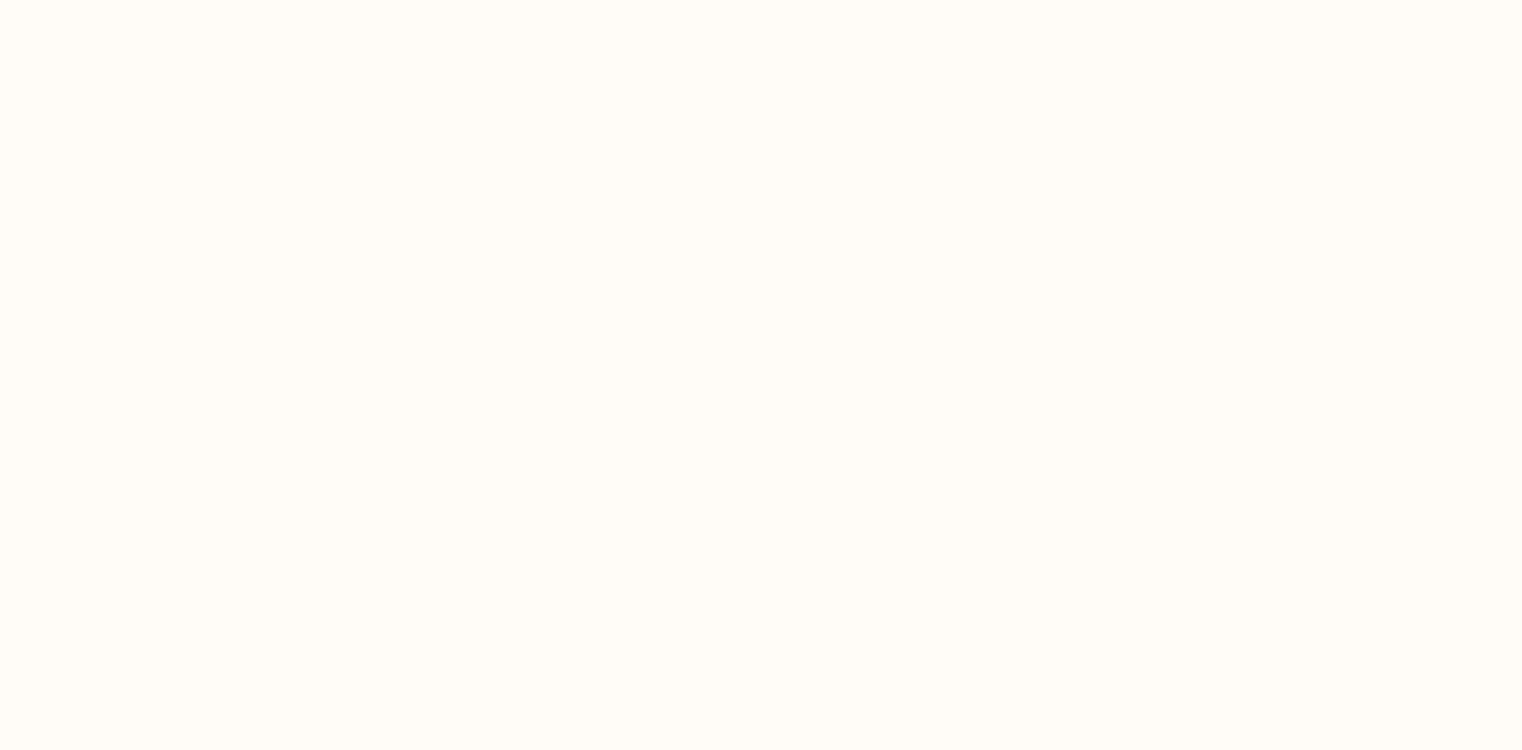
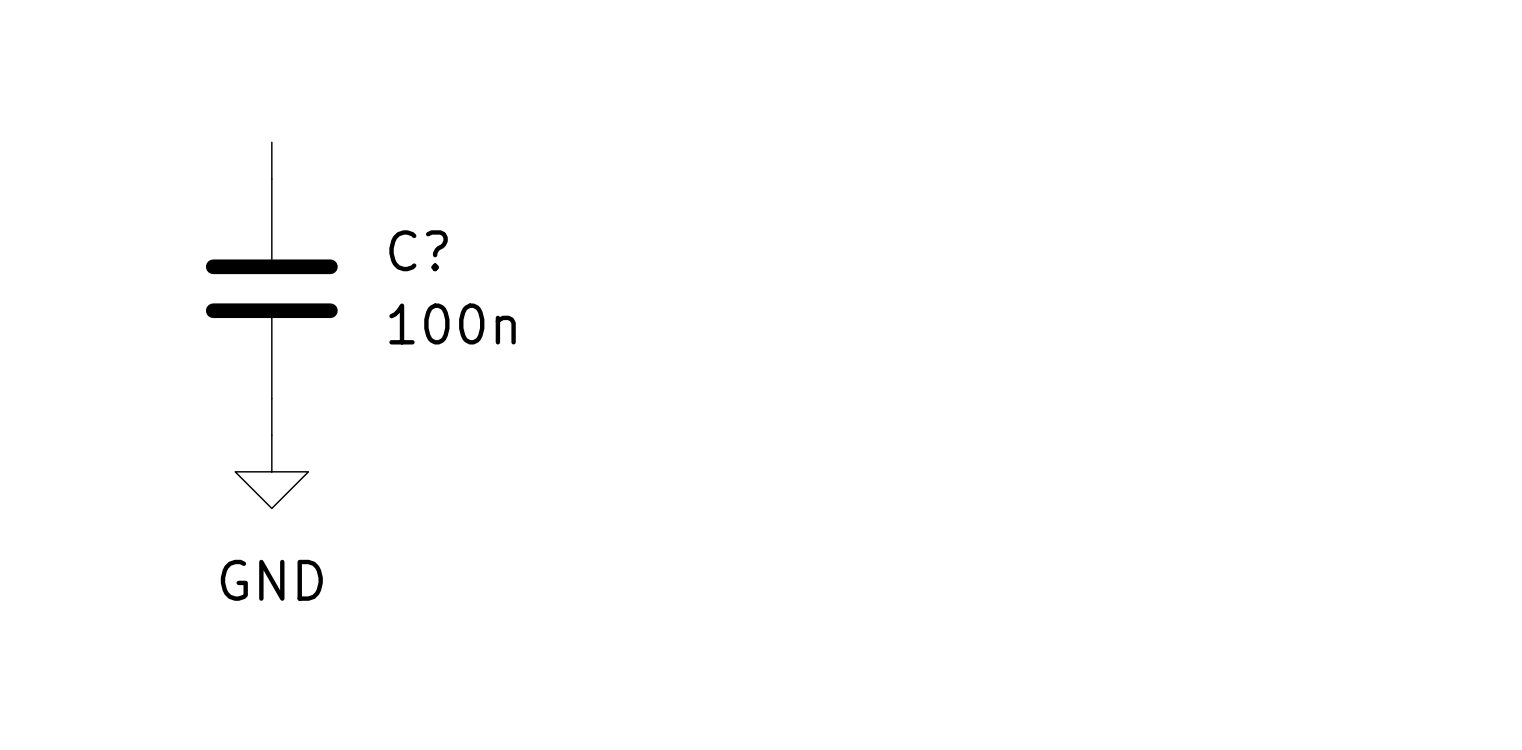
wire: none -> (271, 142) (271, 178)
C?: none -> 100n (271, 288)
wire: none -> (271, 398) (271, 435)
power symbol: none -> GND (271, 471)

